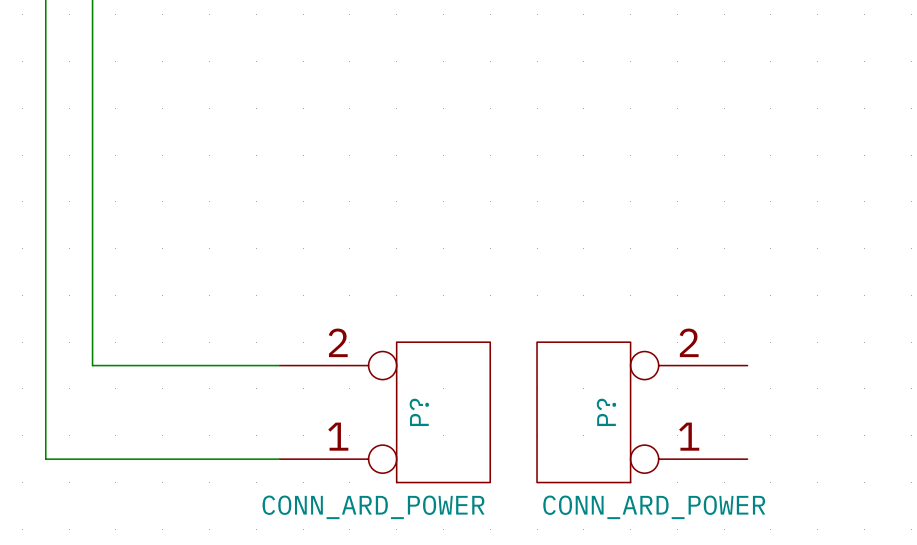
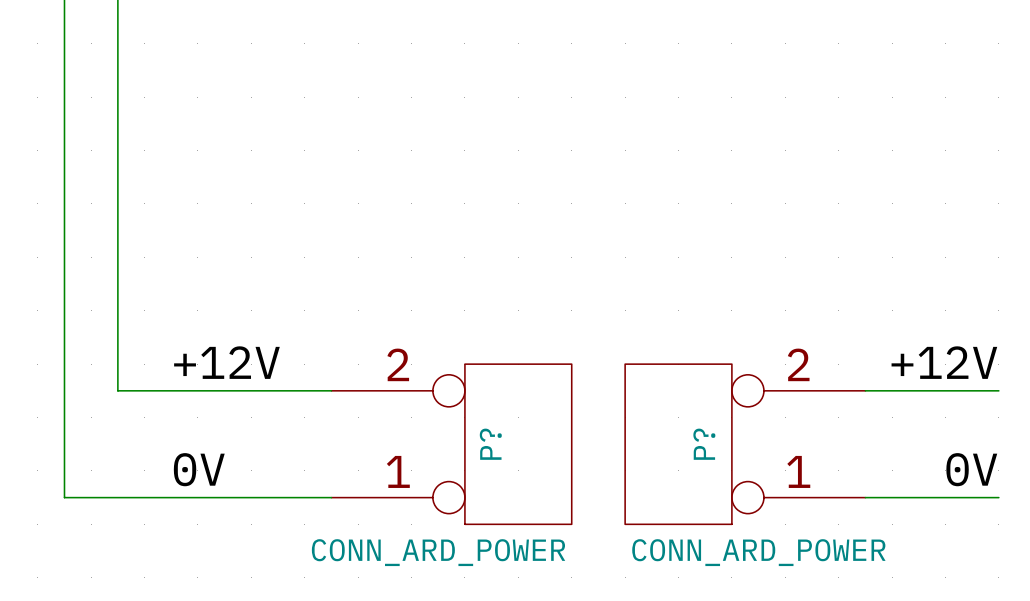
label: none -> +12V (226, 362)
label: none -> +12V (944, 362)
wire: none -> (865, 390) (998, 390)
label: none -> 0V (199, 469)
label: none -> 0V (971, 469)
wire: none -> (865, 497) (998, 497)

